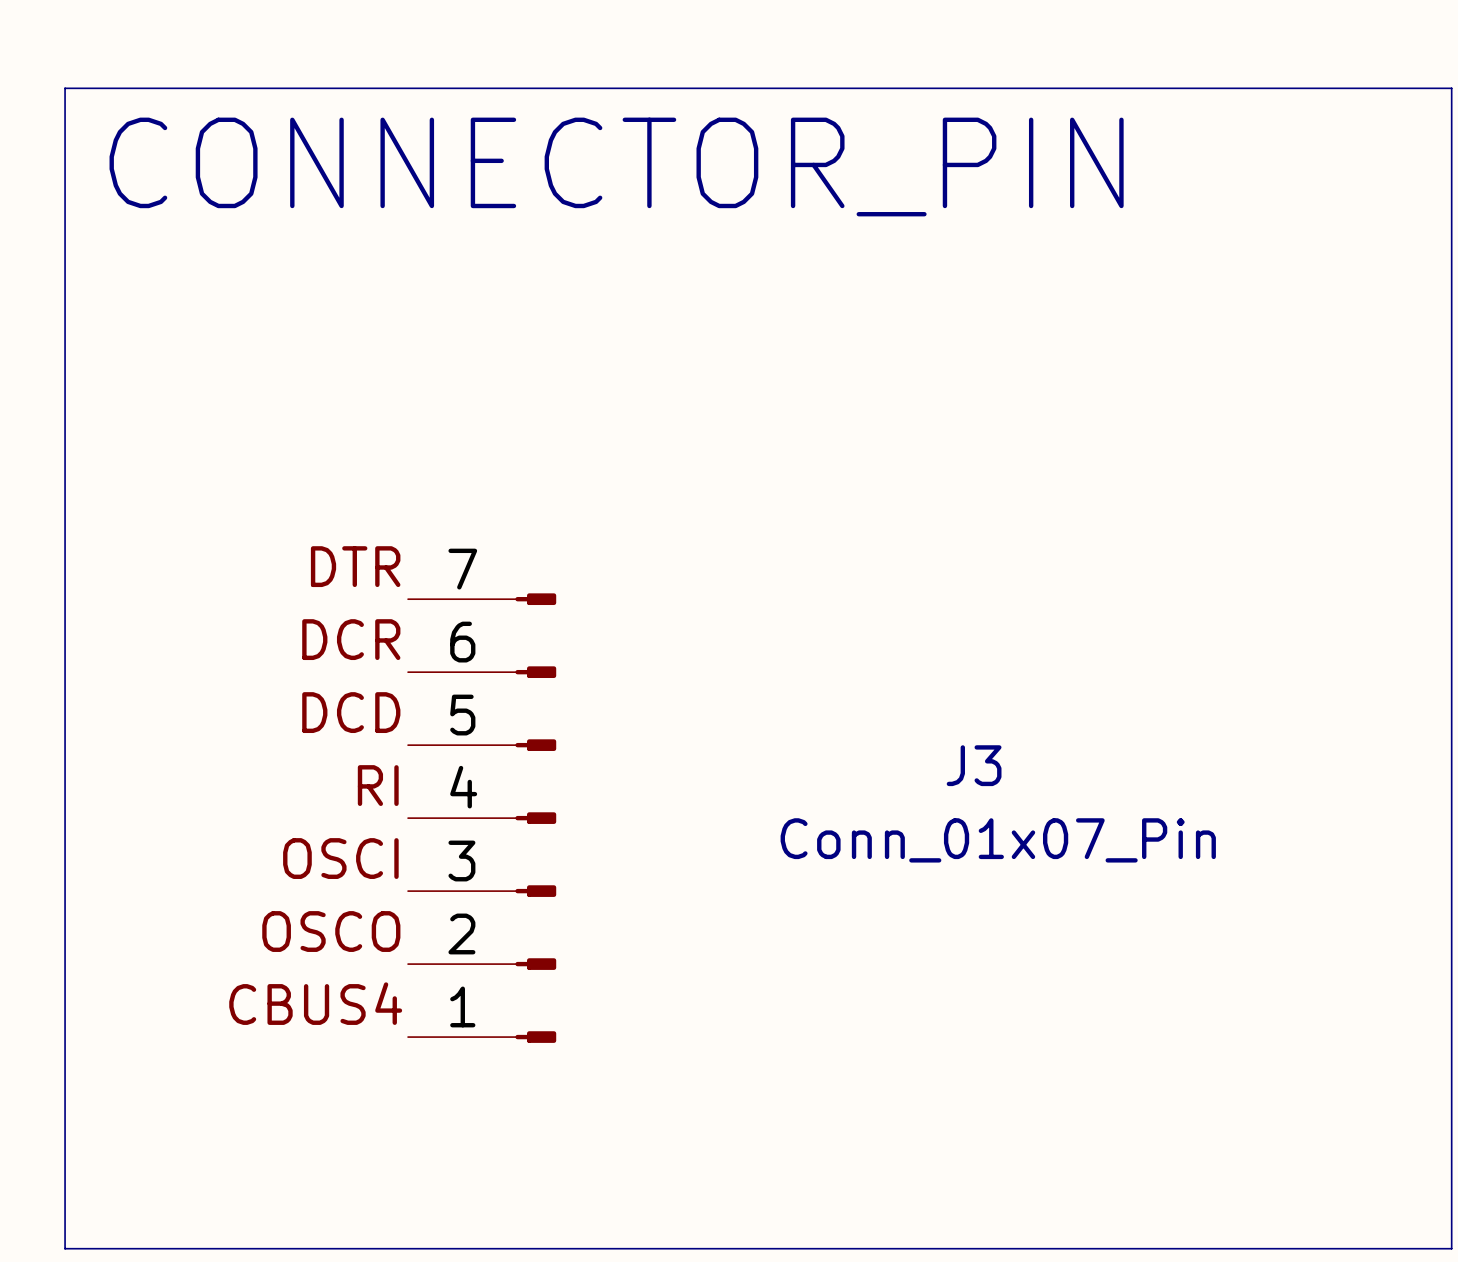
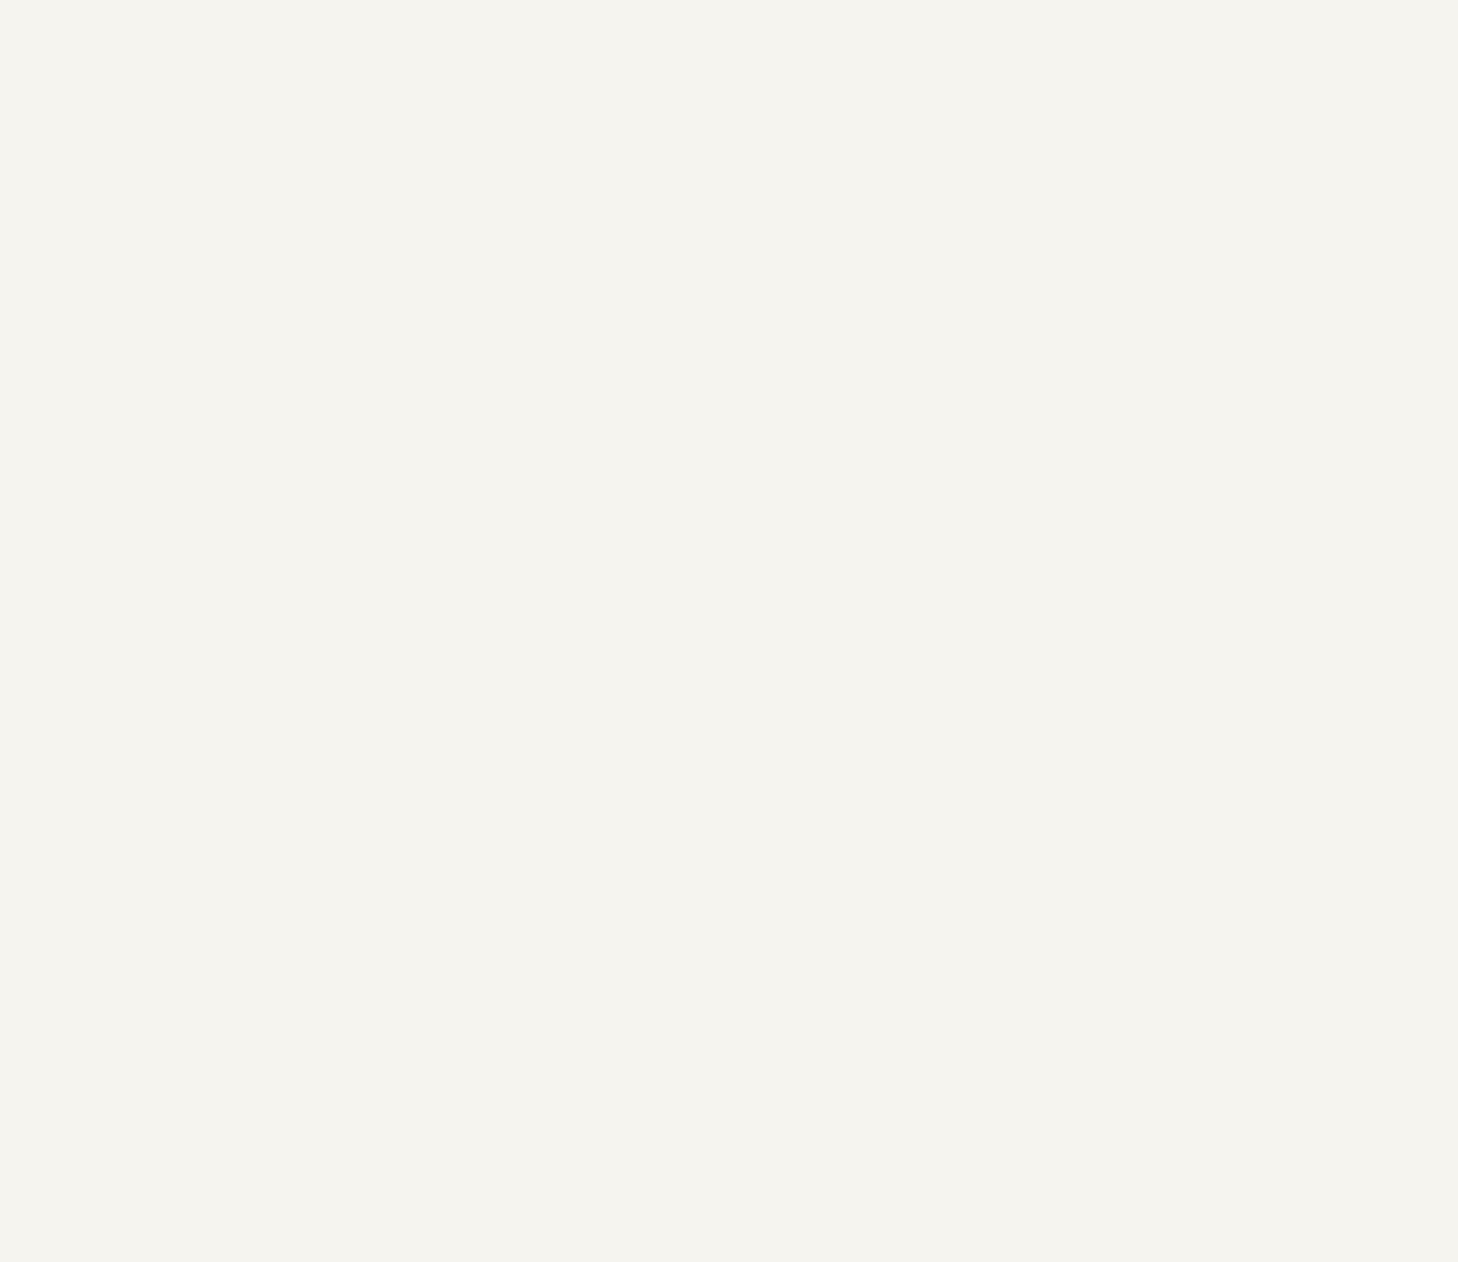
line: (65, 88) (1451, 88) (1451, 1248) (65, 1248) (65, 88) -> none
text: CONNECTOR_PIN (616, 167) -> none
label: DTR (355, 566) -> none
label: DCR (351, 639) -> none
label: DCD (351, 712) -> none
label: RI (378, 785) -> none
J3: Conn_01x07_Pin (482, 818) -> none
label: OSCI (340, 858) -> none
label: OSCO (331, 931) -> none
label: CBUS4 (315, 1003) -> none

